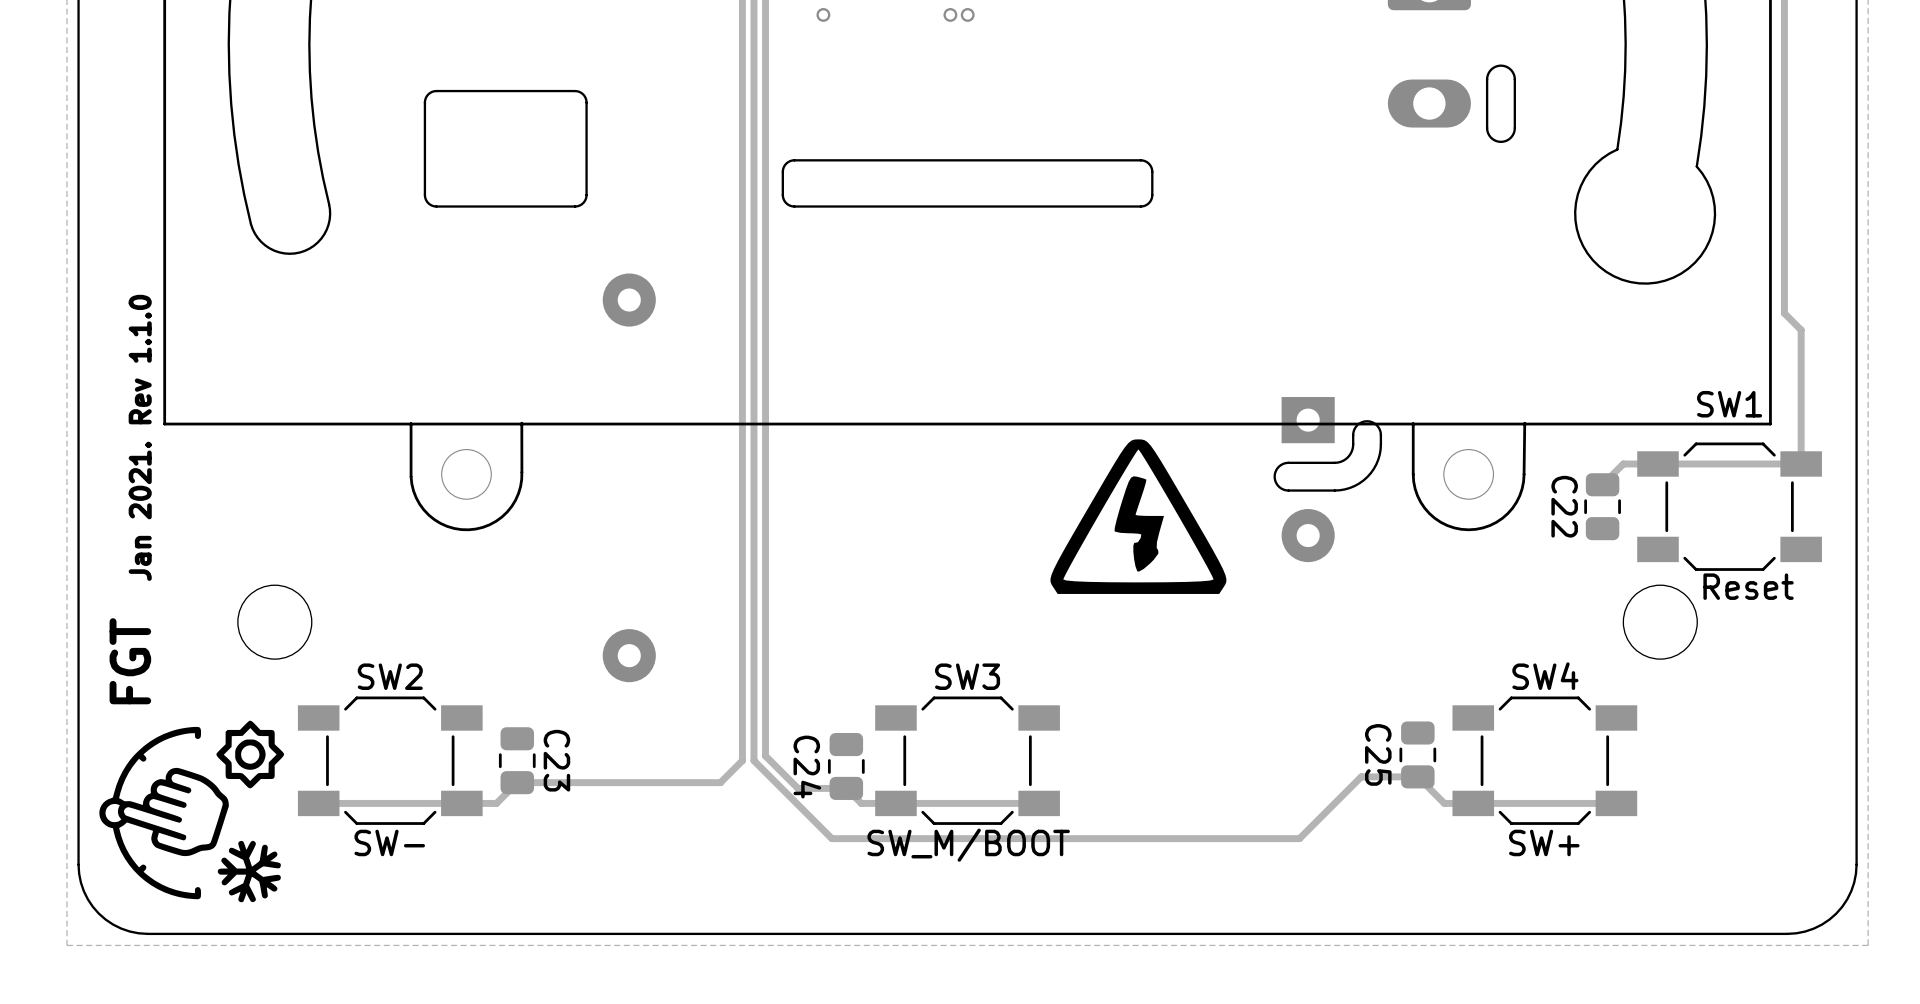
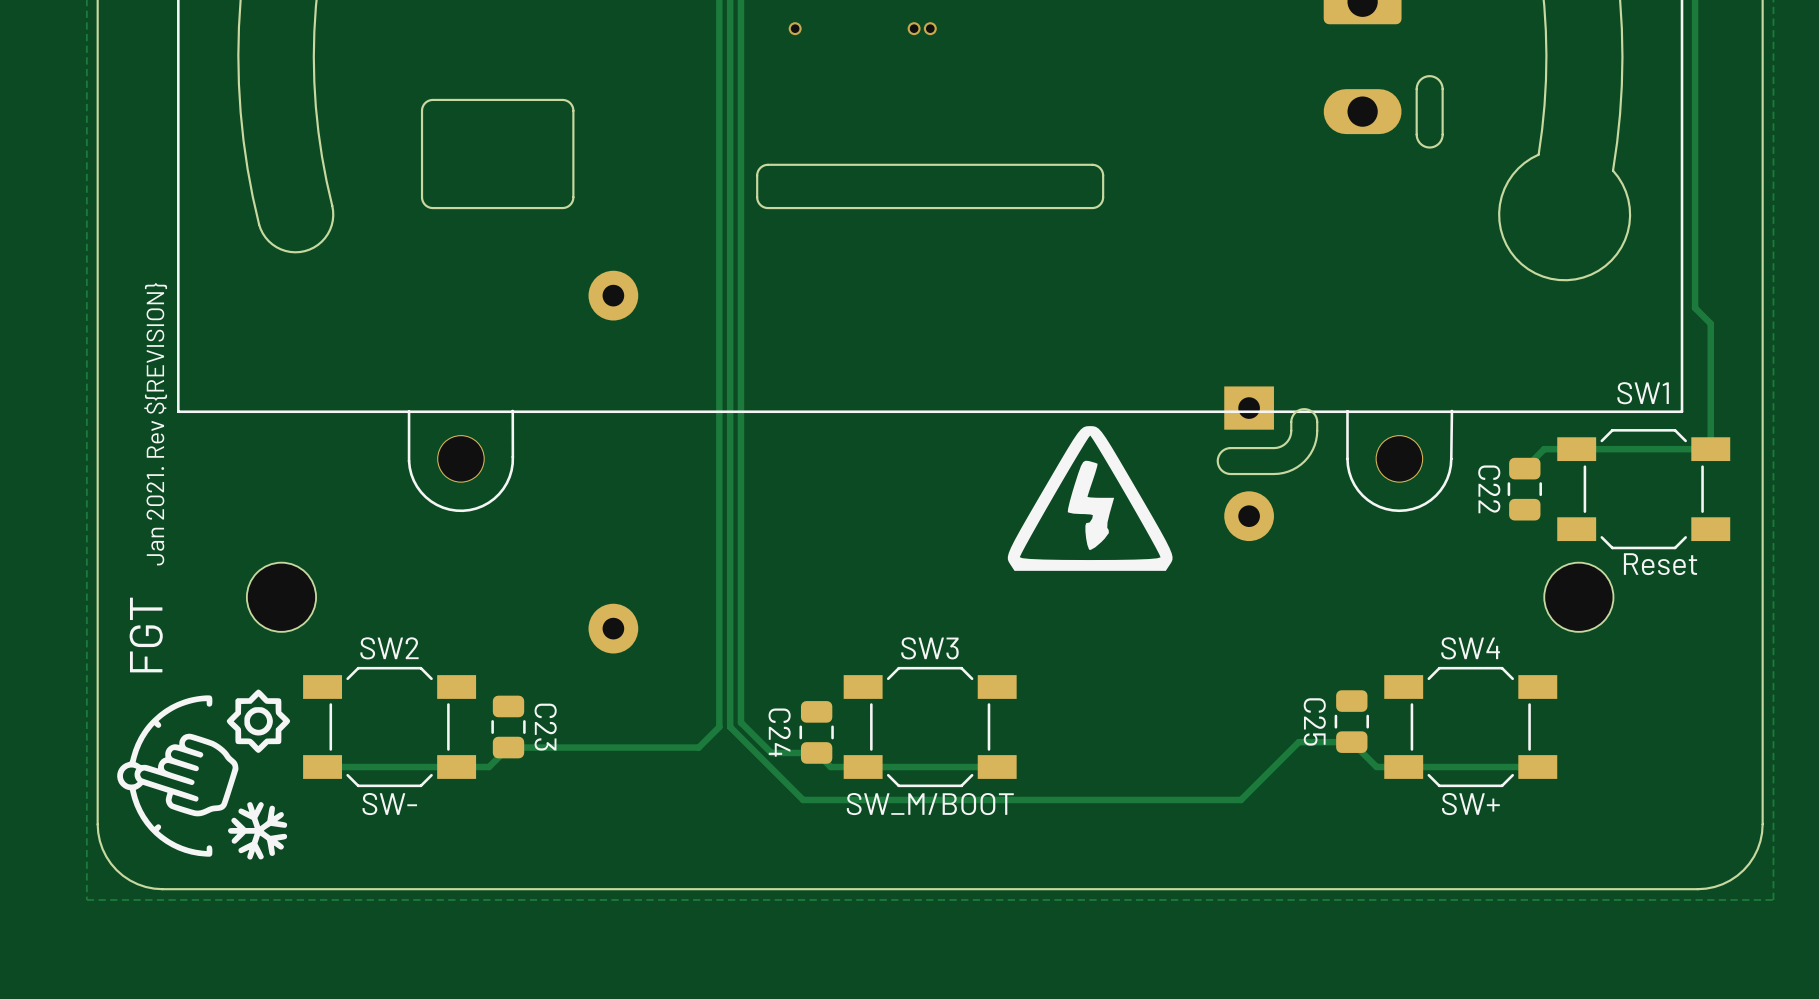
text: Jan 2021. Rev 1.1.0 (140, 437) -> Jan 2021. Rev ${REVISION} (155, 424)

